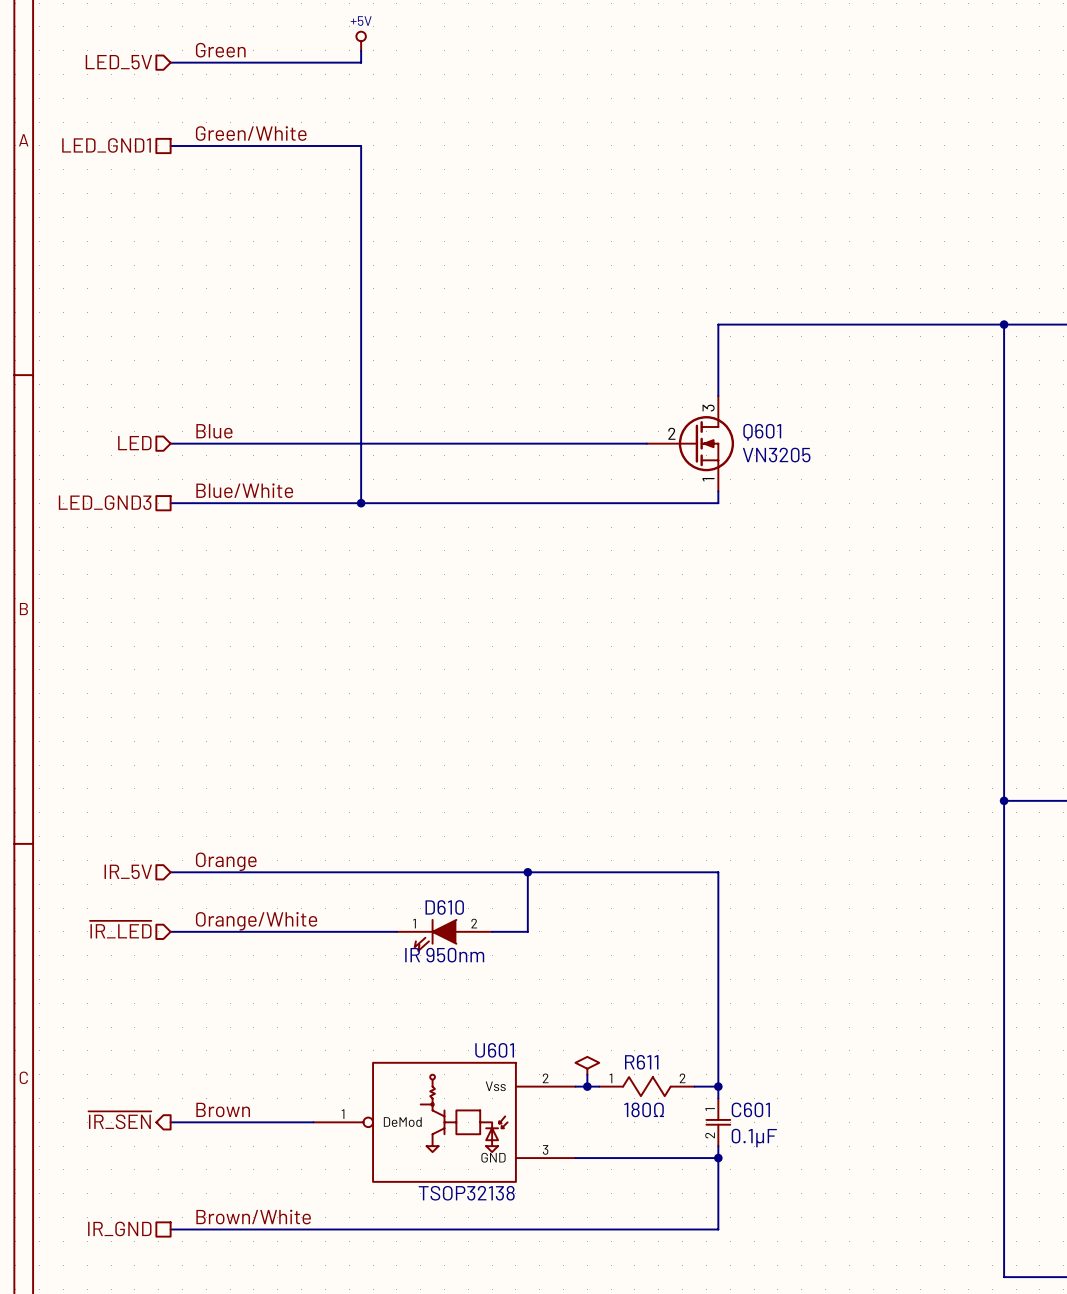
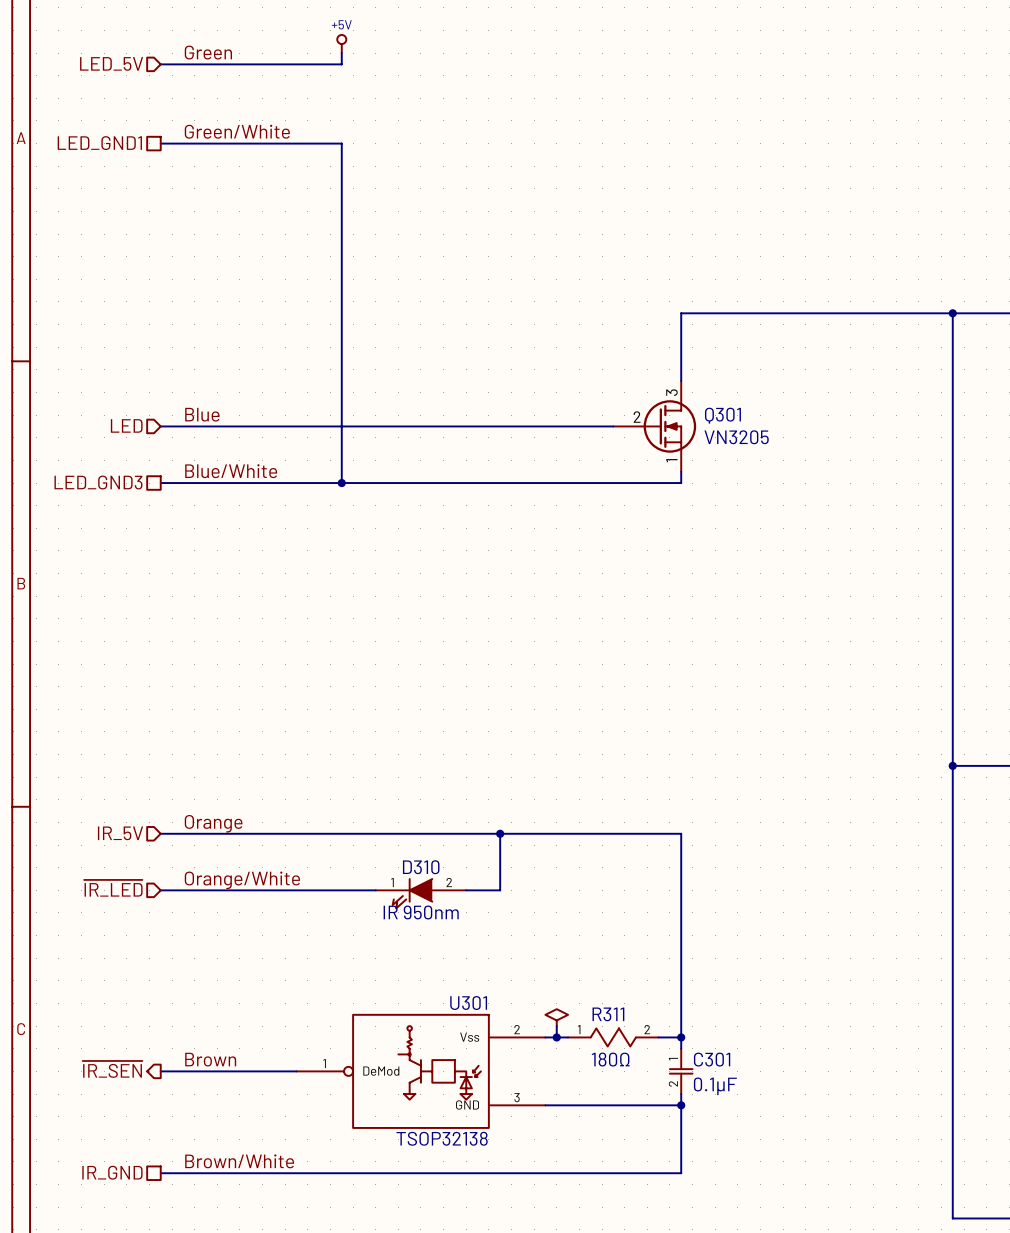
Q601 name: Q601 (762, 432) -> Q301 (722, 415)
D610 name: D610 (444, 907) -> D310 (421, 867)
U601 name: U601 (494, 1050) -> U301 (468, 1003)
R611 name: R611 (641, 1062) -> R311 (608, 1014)
C601 name: C601 (750, 1109) -> C301 (712, 1059)

